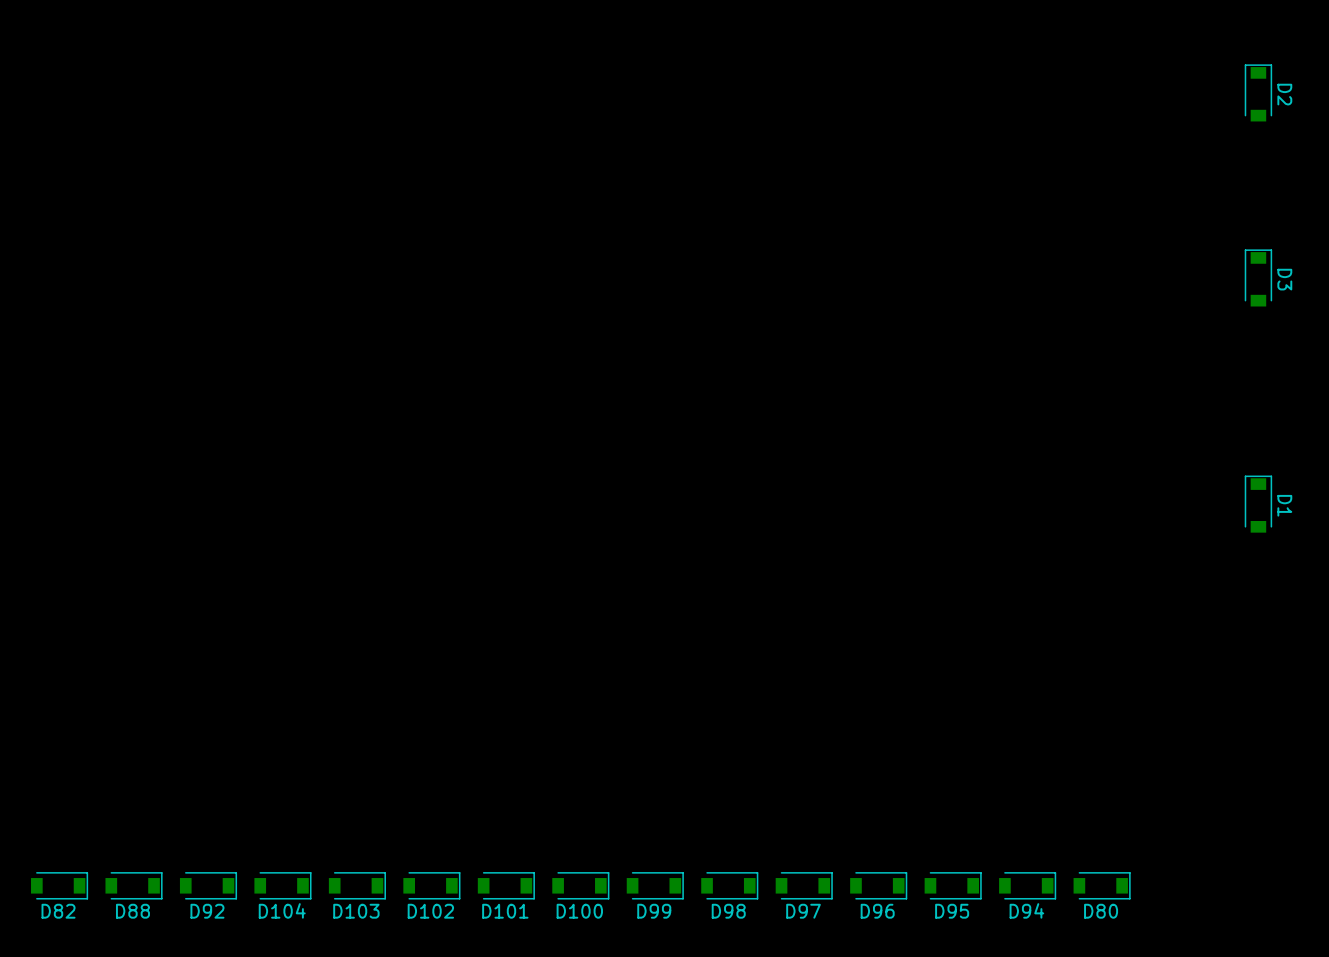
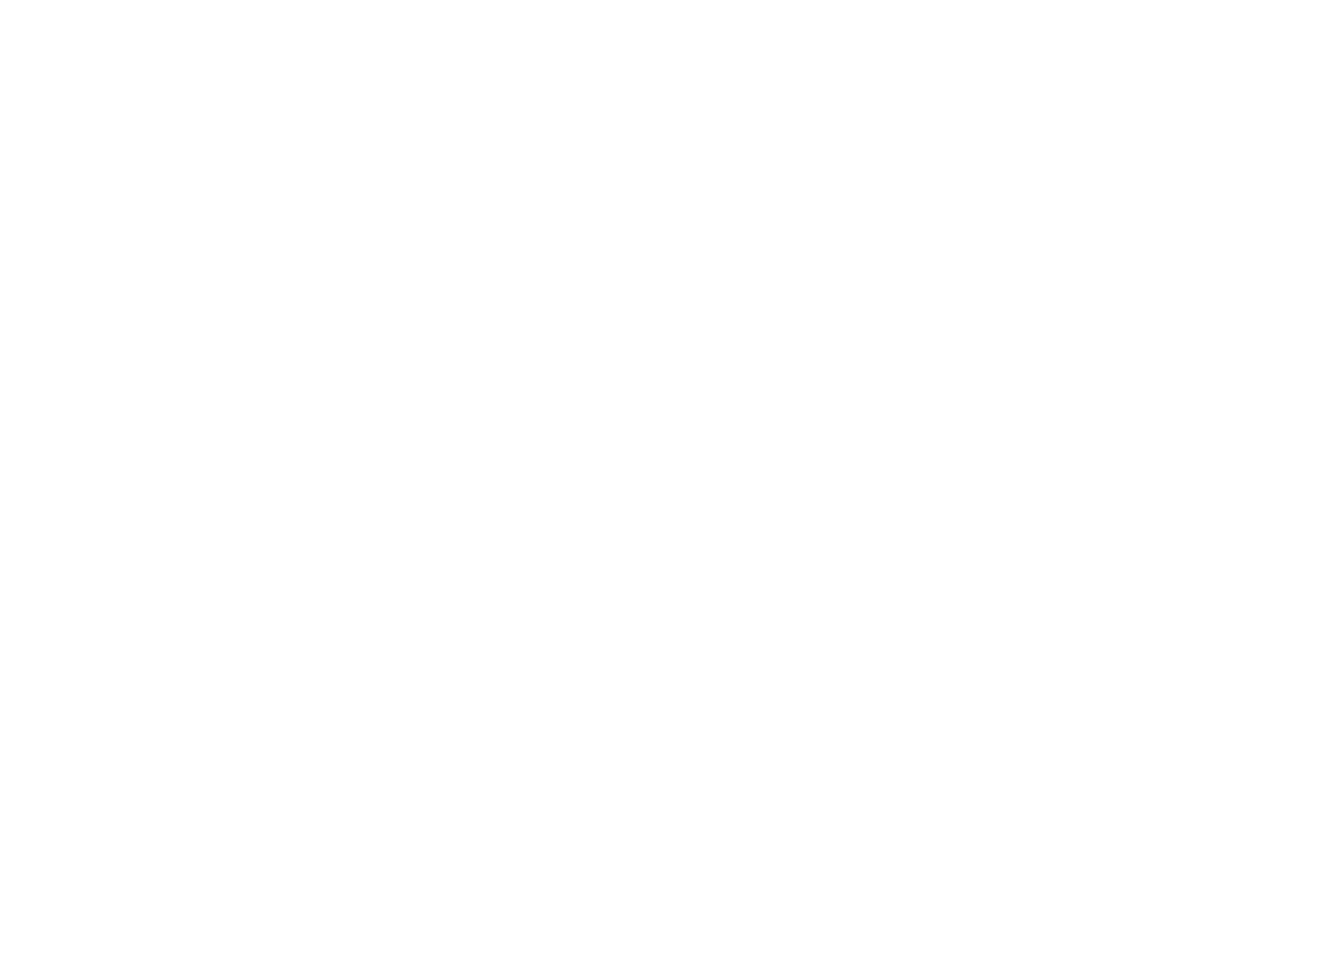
D2: (1258, 92) -> none
D3: (1258, 277) -> none
D1: (1258, 504) -> none
D82: (59, 885) -> none
D88: (134, 885) -> none
D92: (208, 885) -> none
D104: (282, 885) -> none
D103: (357, 885) -> none
D102: (431, 885) -> none
D101: (506, 885) -> none
D100: (580, 885) -> none
D99: (655, 885) -> none
D98: (729, 885) -> none
D97: (804, 885) -> none
D96: (878, 885) -> none
D95: (953, 885) -> none
D94: (1027, 885) -> none
D80: (1102, 885) -> none

